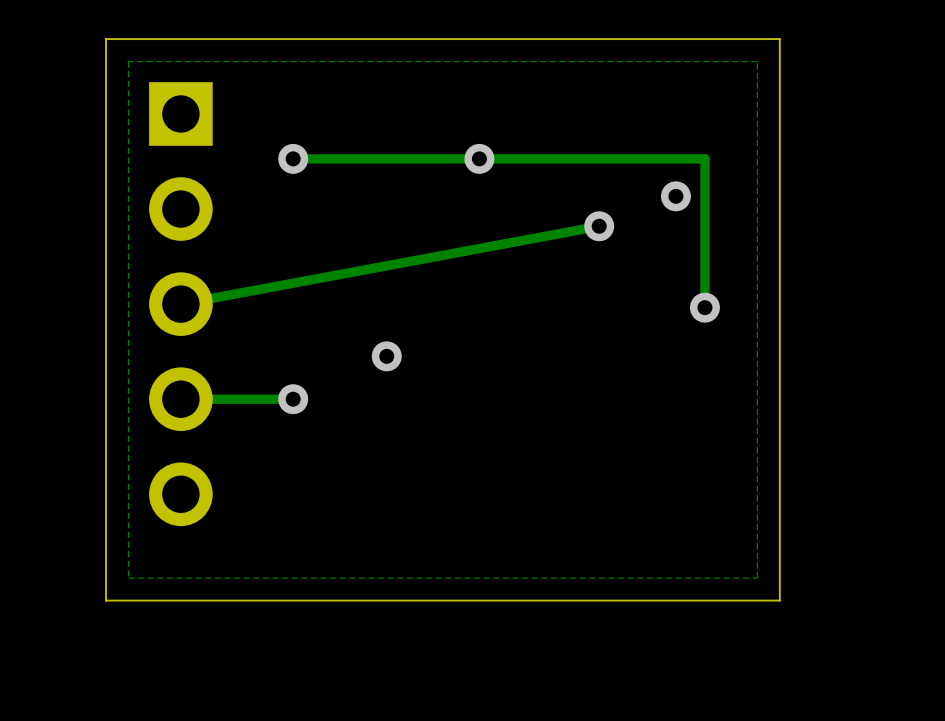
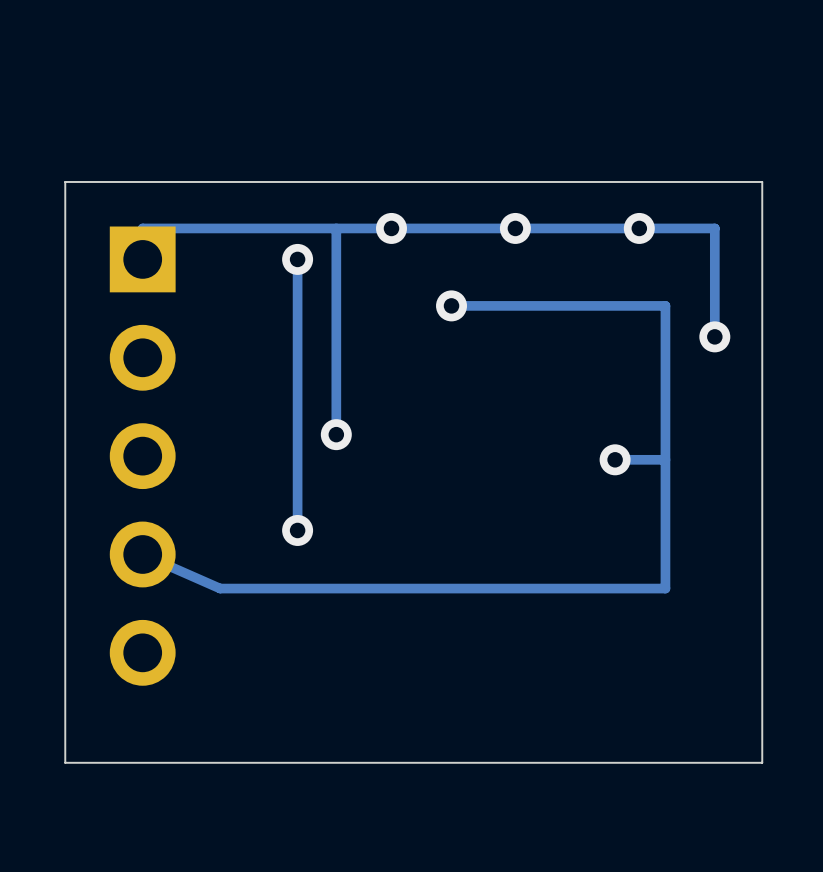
zone outline: (757, 61) (128, 61) (128, 578) (757, 578) (757, 61) -> none
track: none -> (336, 228) (336, 434)
via: none -> (391, 228)
via: none -> (515, 228)
via: none -> (639, 228)
track: none -> (142, 259) (142, 228) (714, 228) (714, 336)
track: none -> (297, 259) (297, 530)
via position: (293, 158) -> (297, 259)
track: (479, 158) (293, 158) -> none
track: (686, 158) (704, 158) (704, 307) -> none
via: none -> (714, 336)
via: (675, 196) -> none
track: (599, 226) (180, 304) -> none
via: (599, 226) -> none
via: none -> (336, 434)
via: none -> (615, 459)
track: none -> (665, 459) (615, 459)
via: (704, 307) -> none
via: (386, 356) -> none
via: none -> (297, 530)
track: (293, 399) (180, 399) -> (665, 305) (665, 588) (220, 588) (142, 554)
via: (293, 399) -> none

